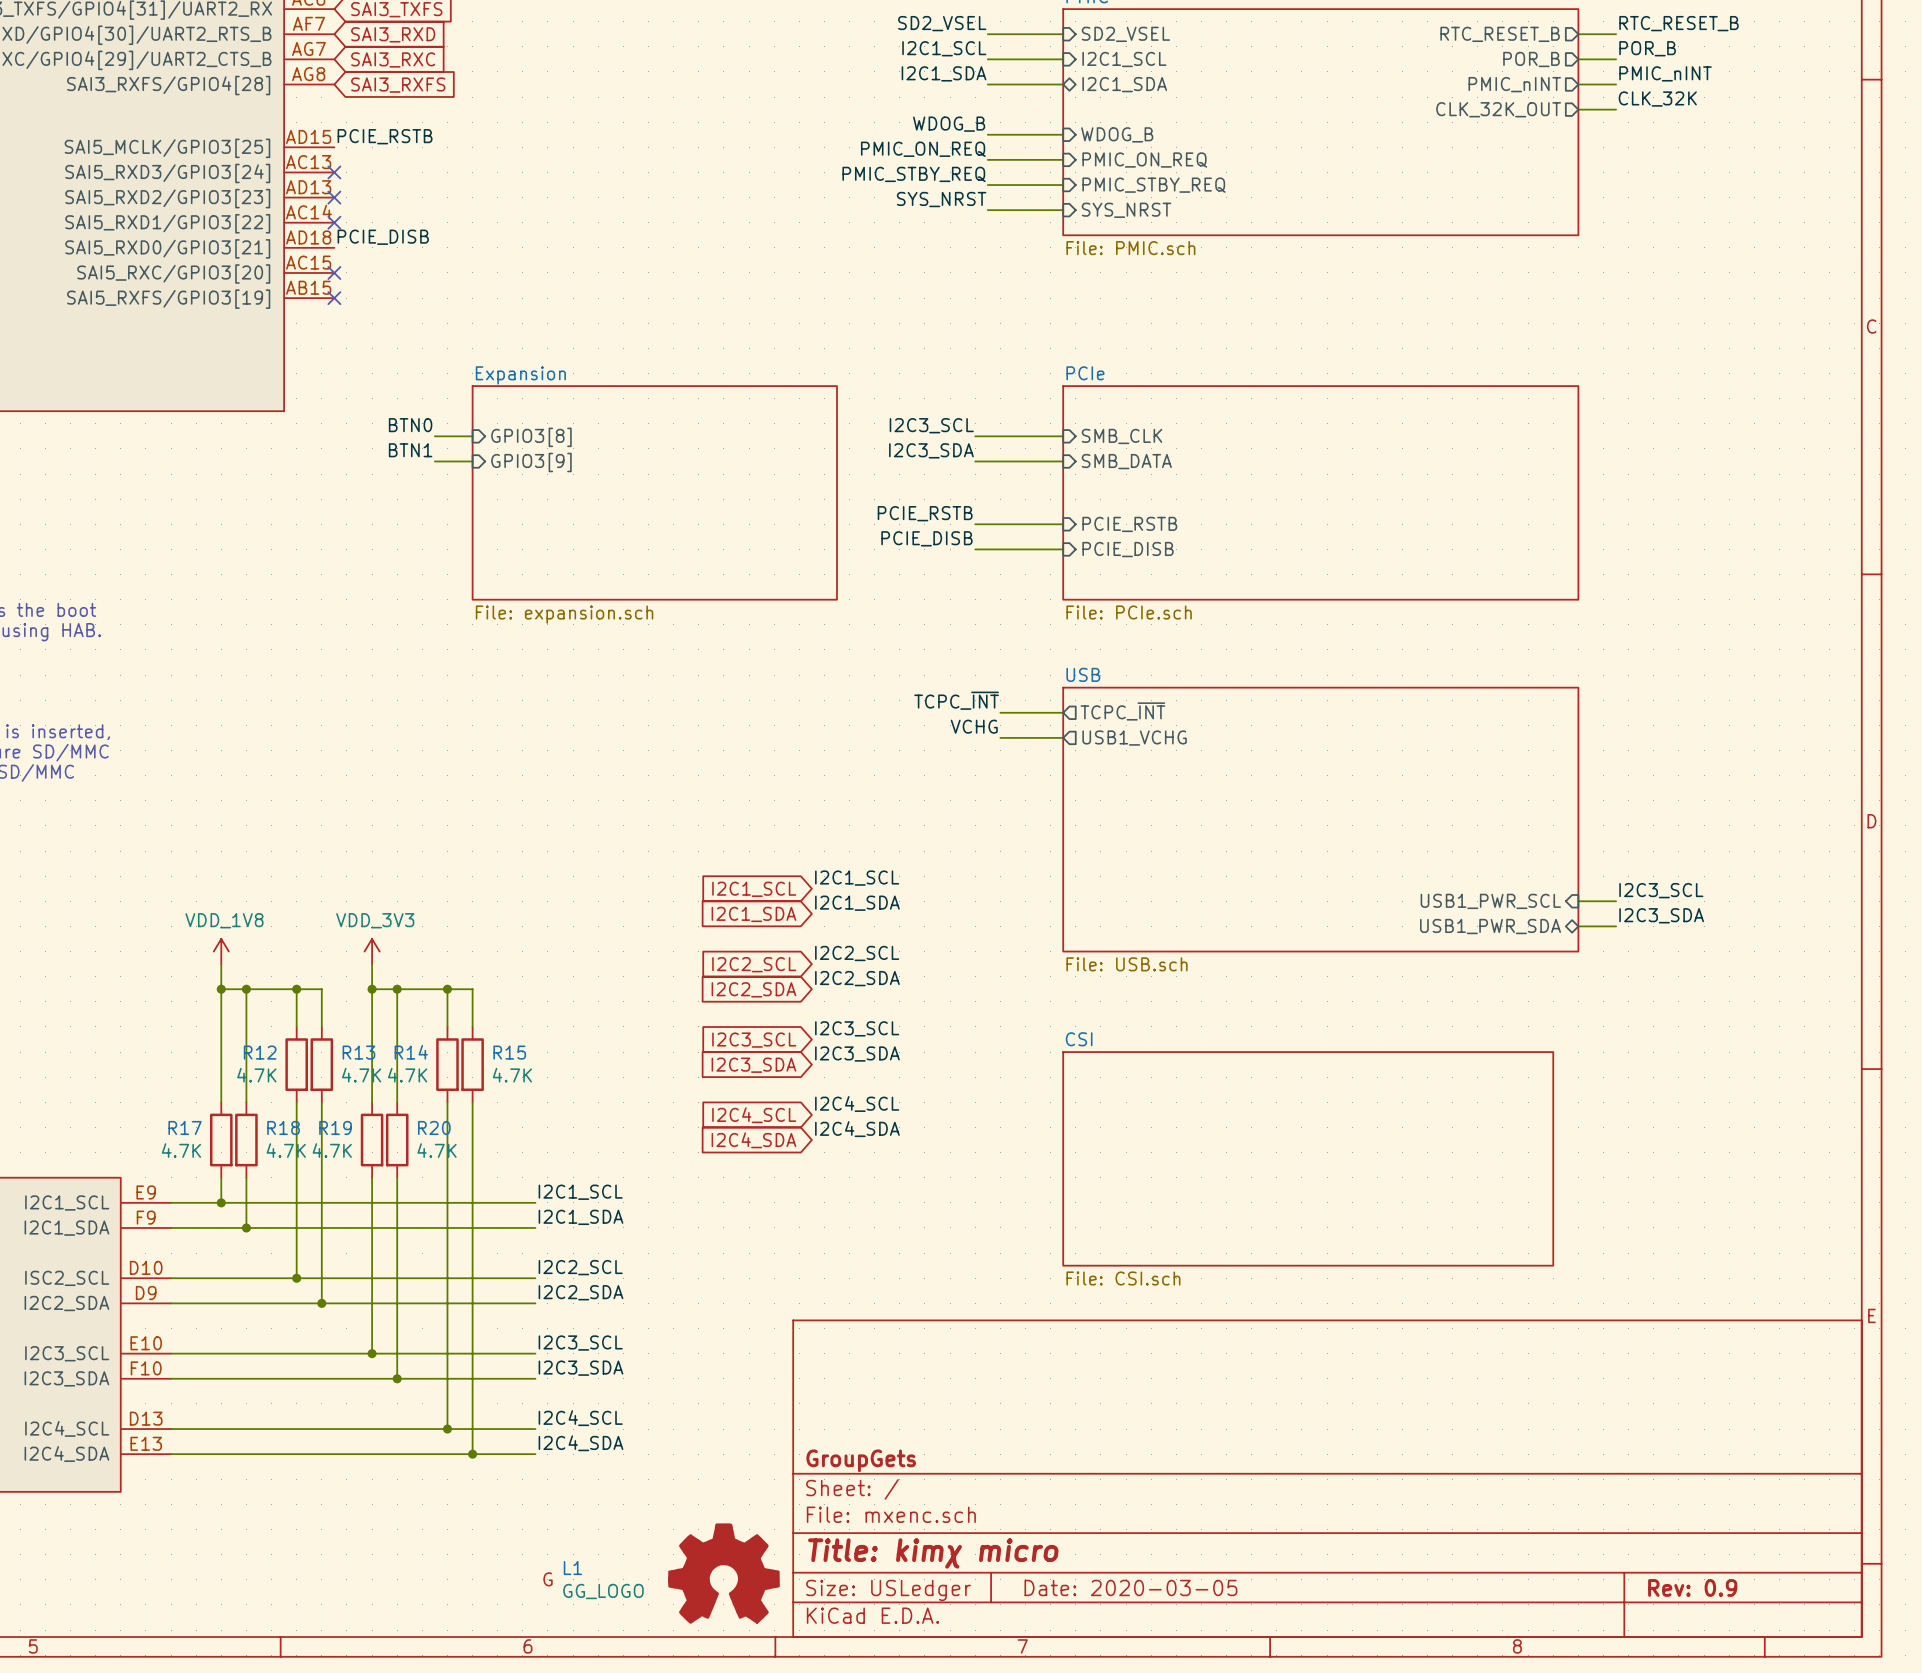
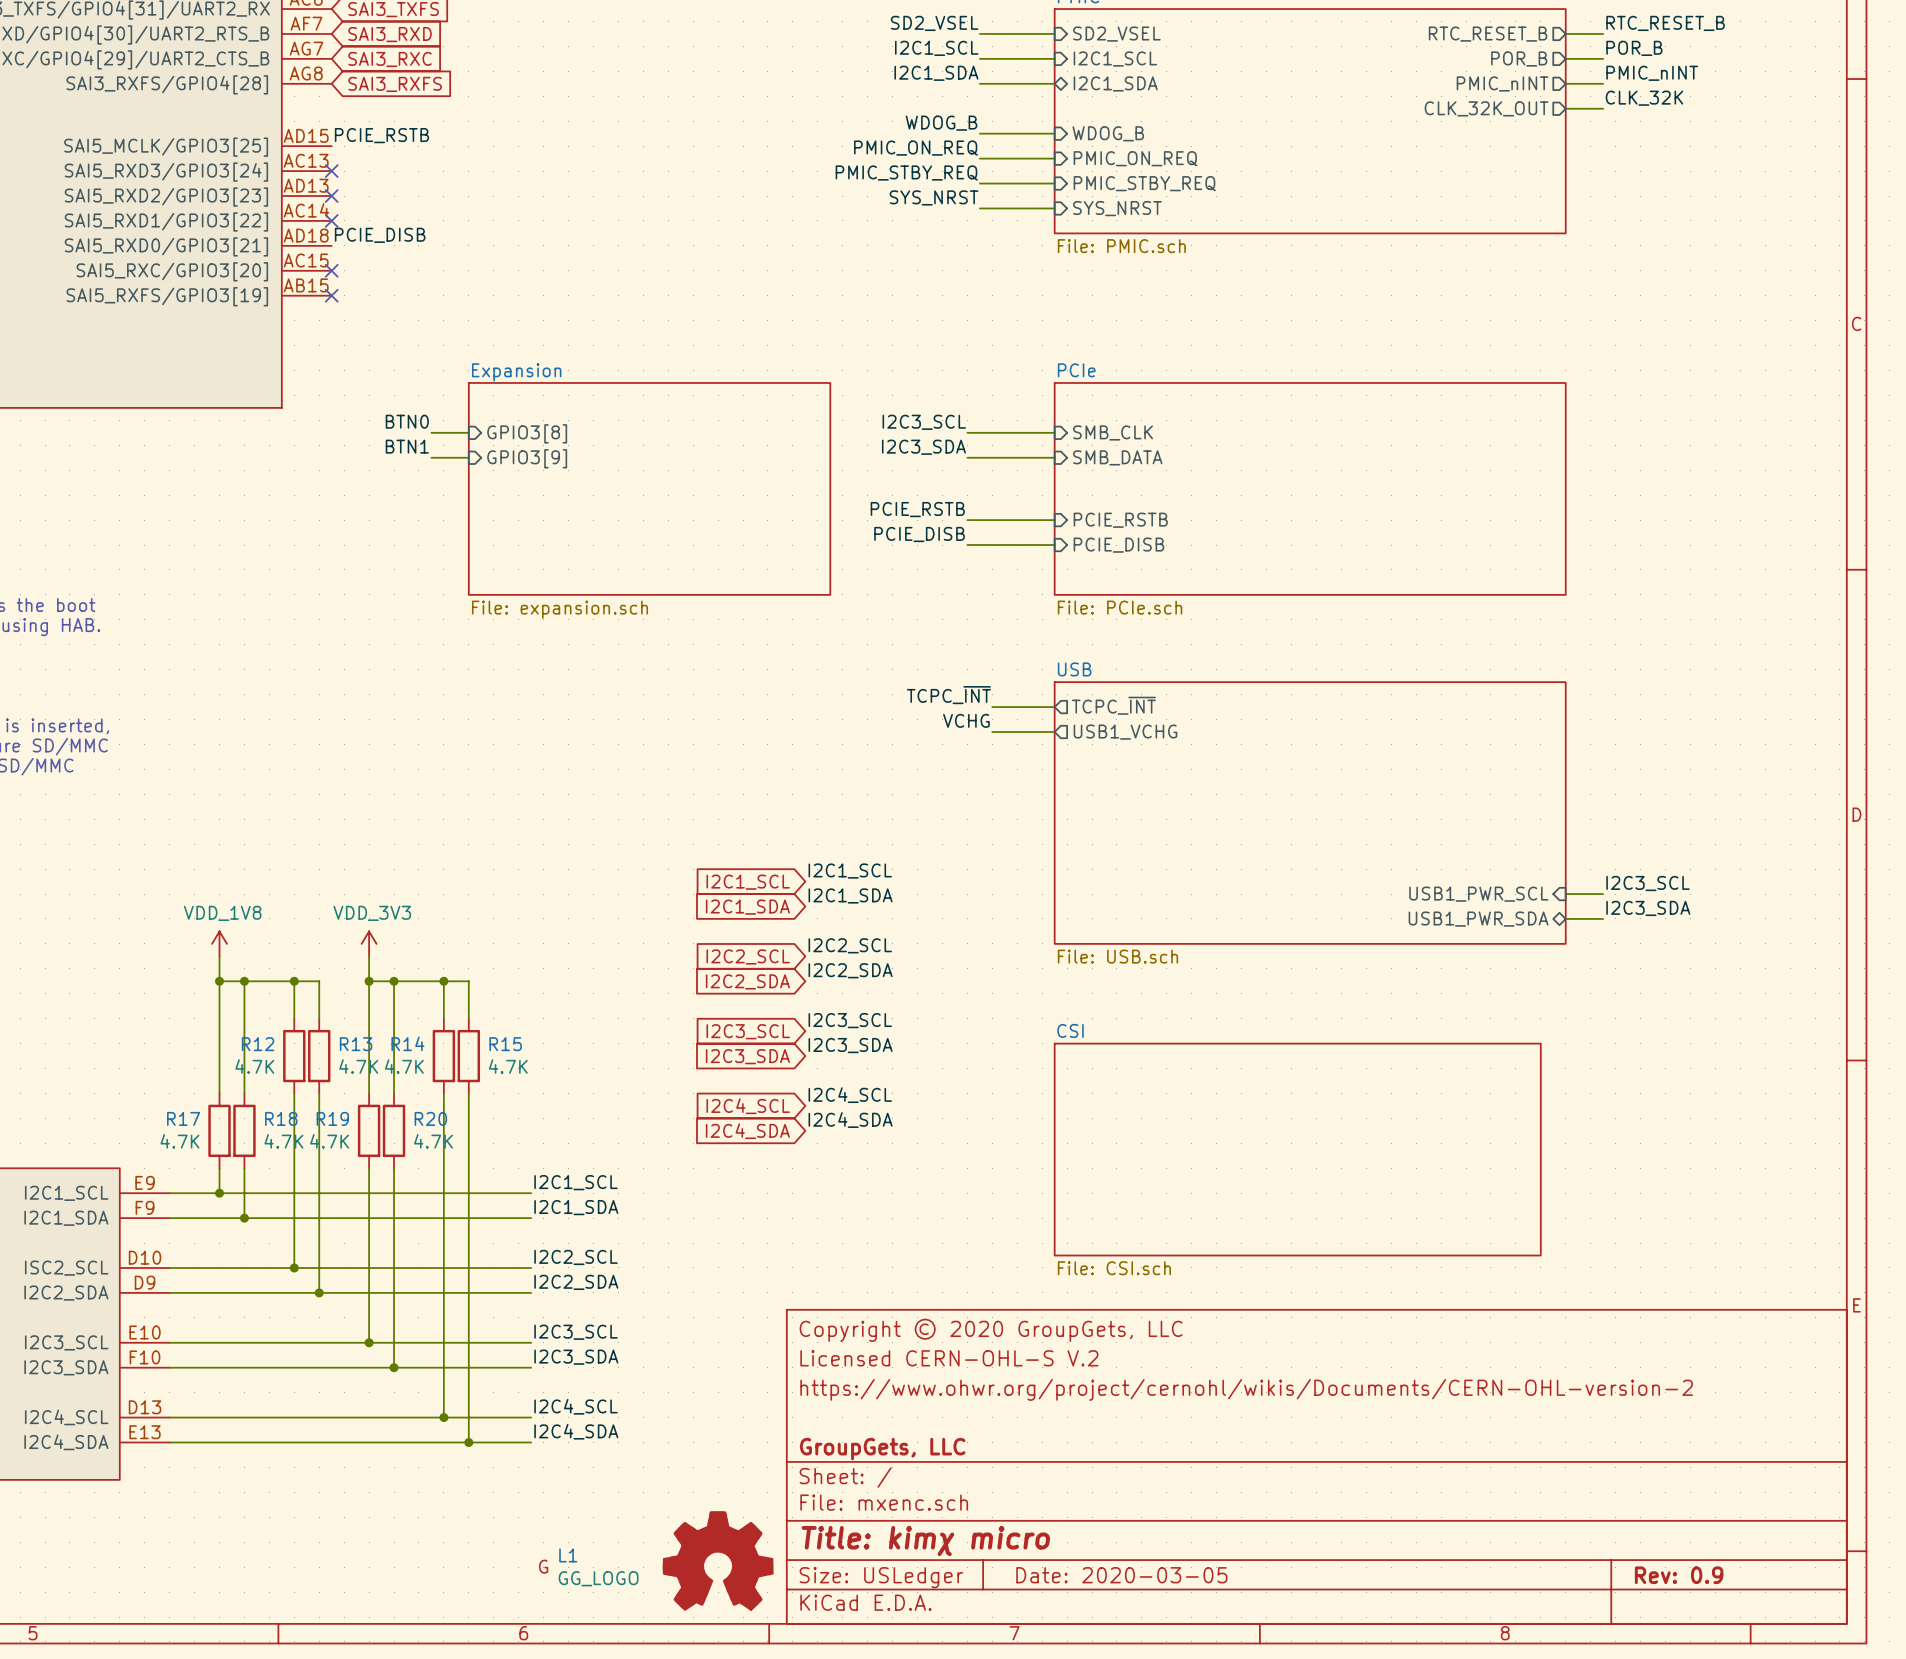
title block: none -> Copyright © 2020 GroupGets, LLC (991, 1330)
title block: none -> Licensed CERN-OHL-S V.2 (949, 1358)
title block: none -> https://www.ohwr.org/project/cernohl/wikis/Documents/CERN-OHL-version-2 (1246, 1389)
title block: GroupGets (861, 1460) -> GroupGets, LLC (882, 1449)

